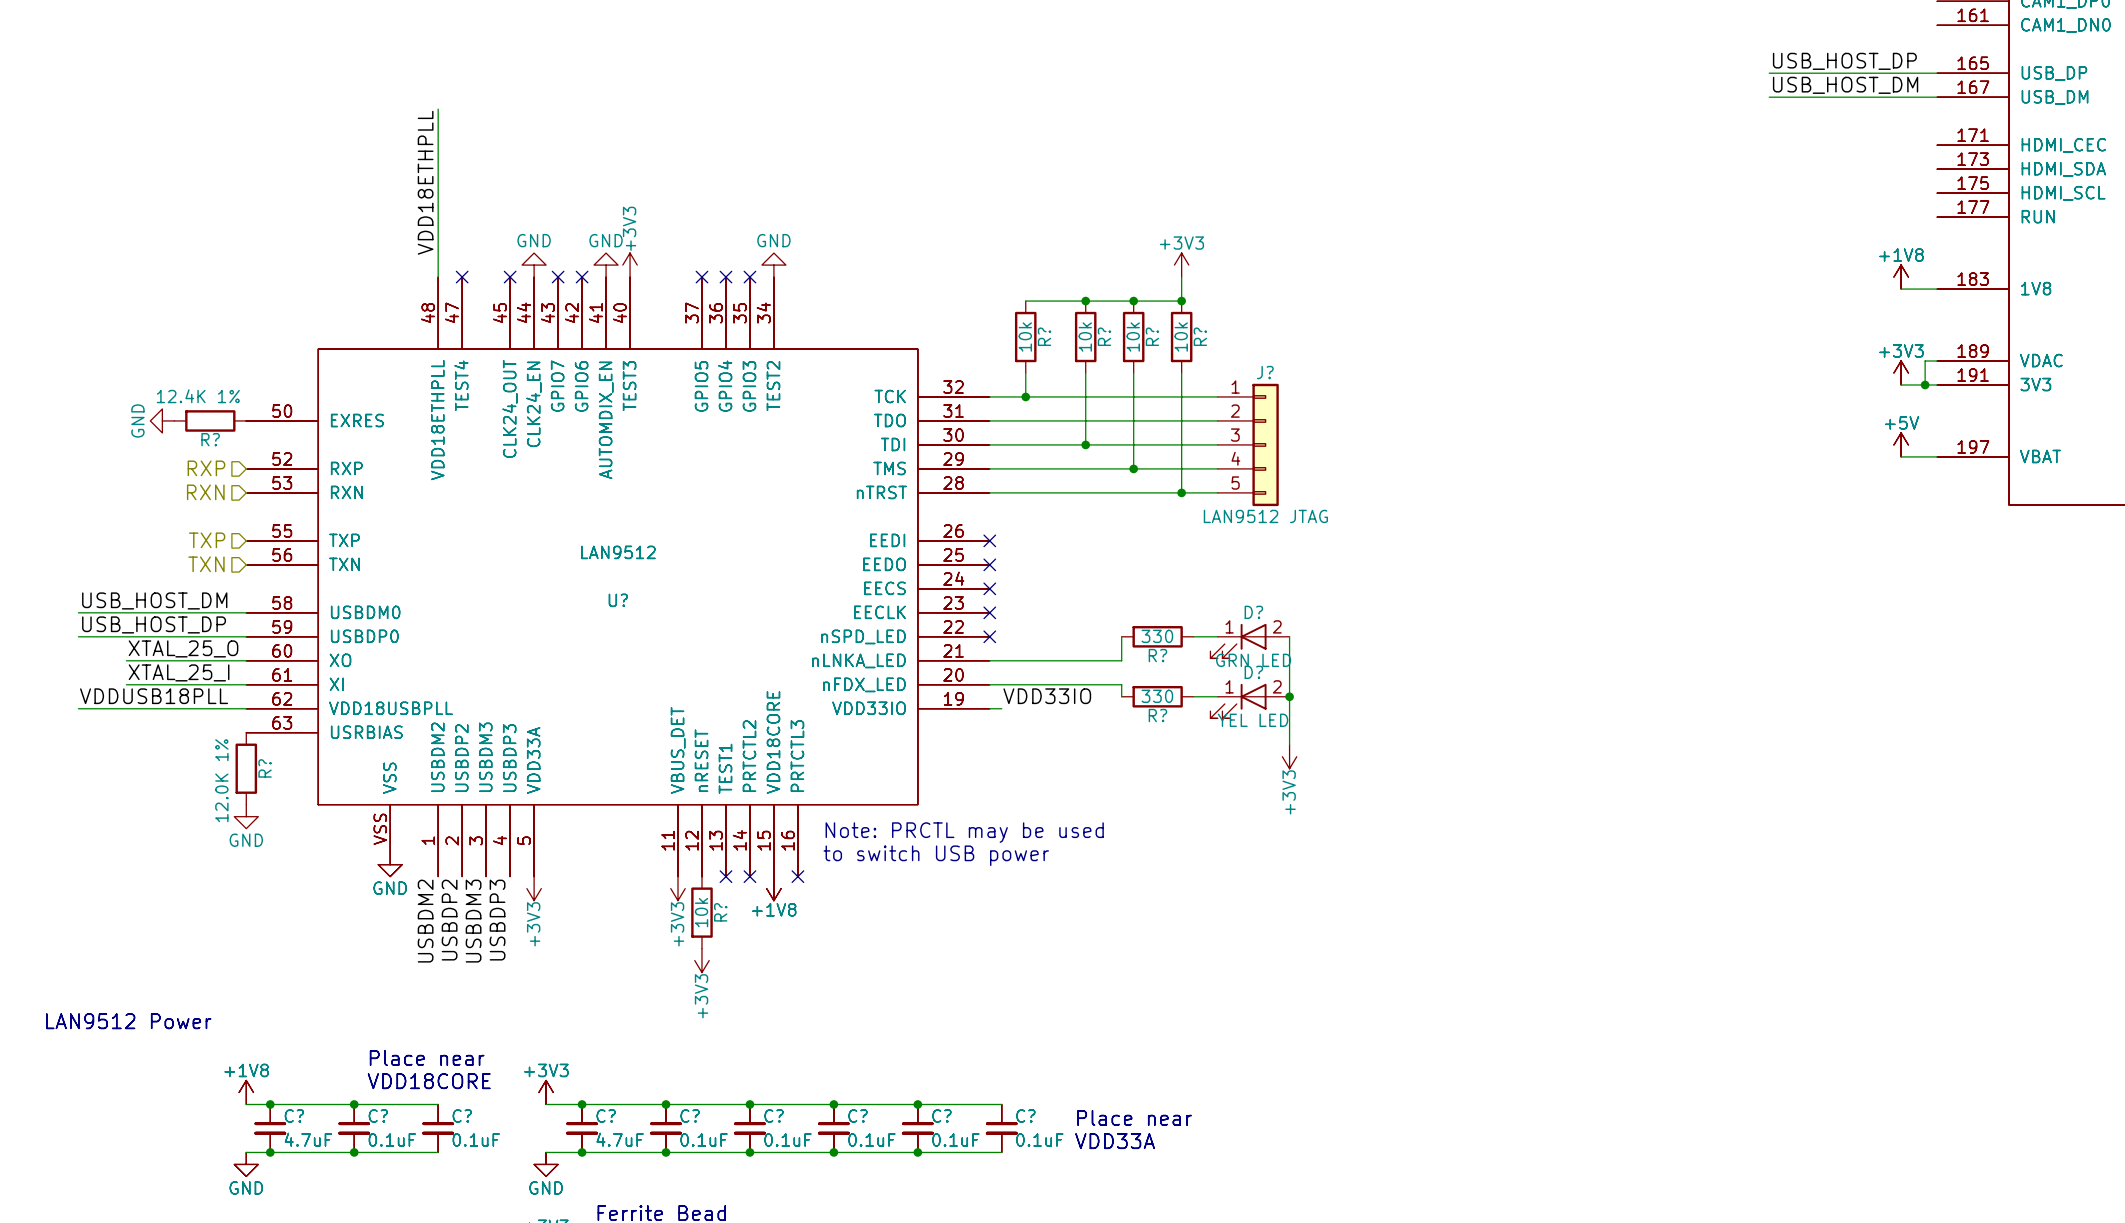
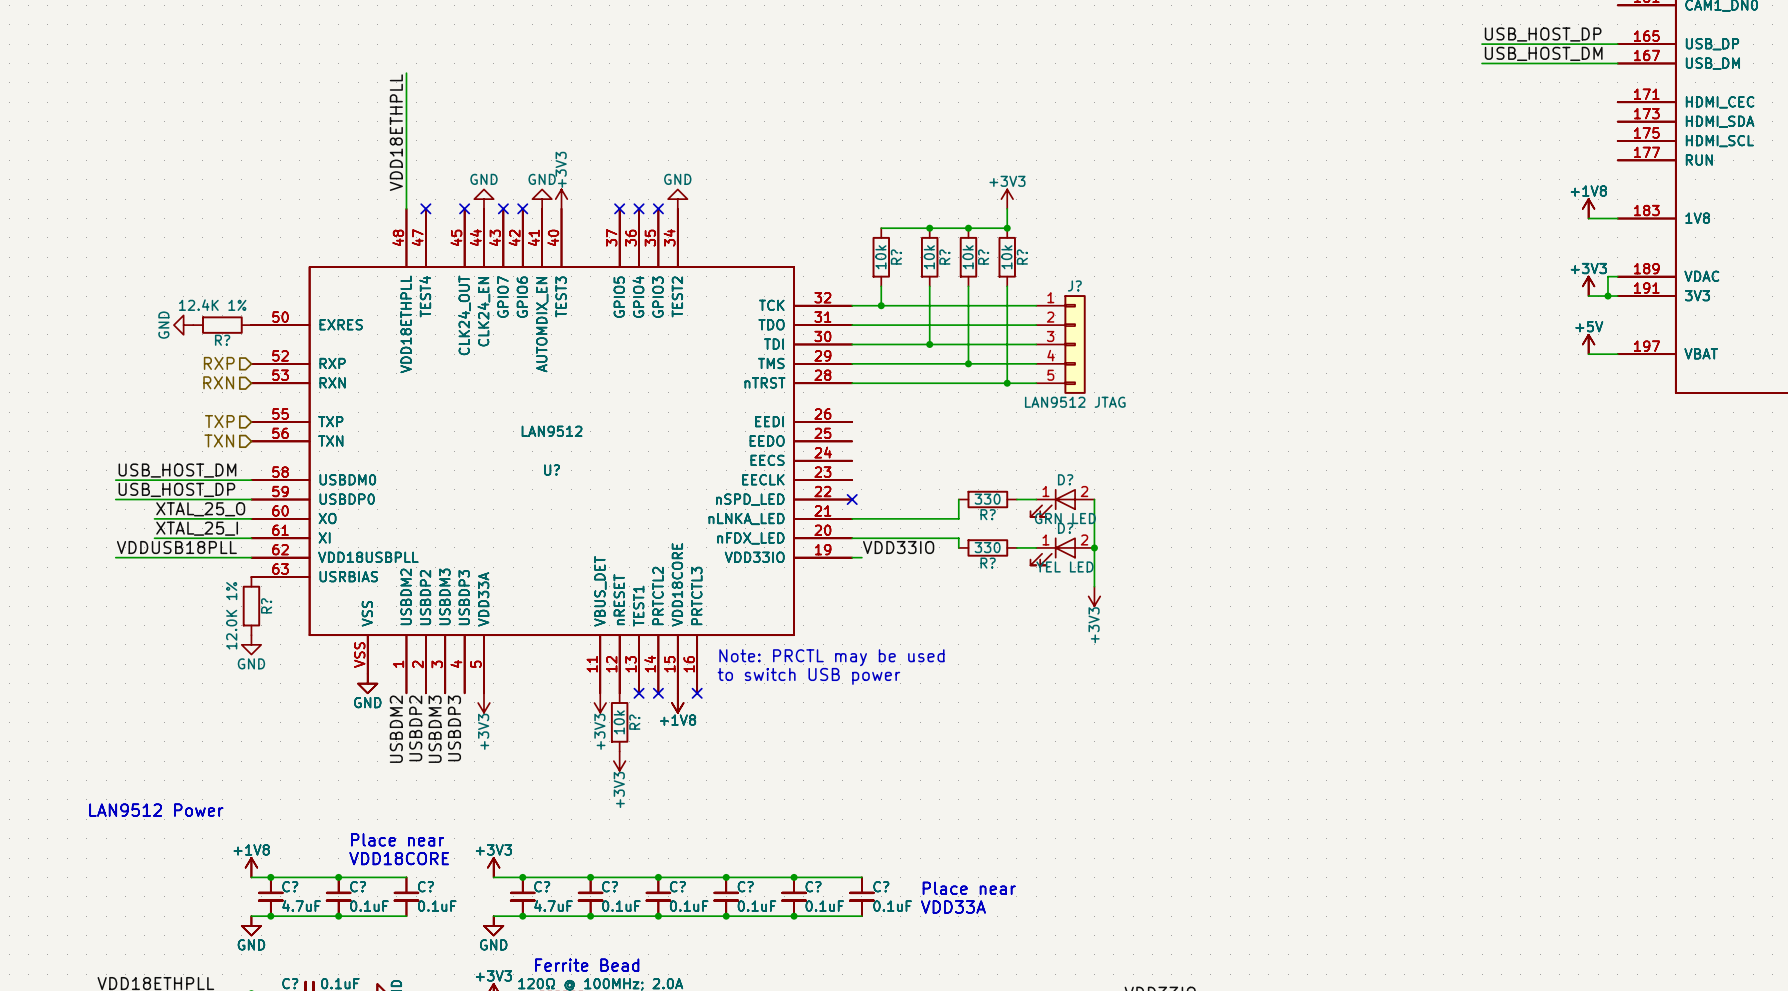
no-connect mark: (989, 540) -> none
no-connect mark: (989, 564) -> none
no-connect mark: (989, 588) -> none
no-connect mark: (989, 612) -> none

